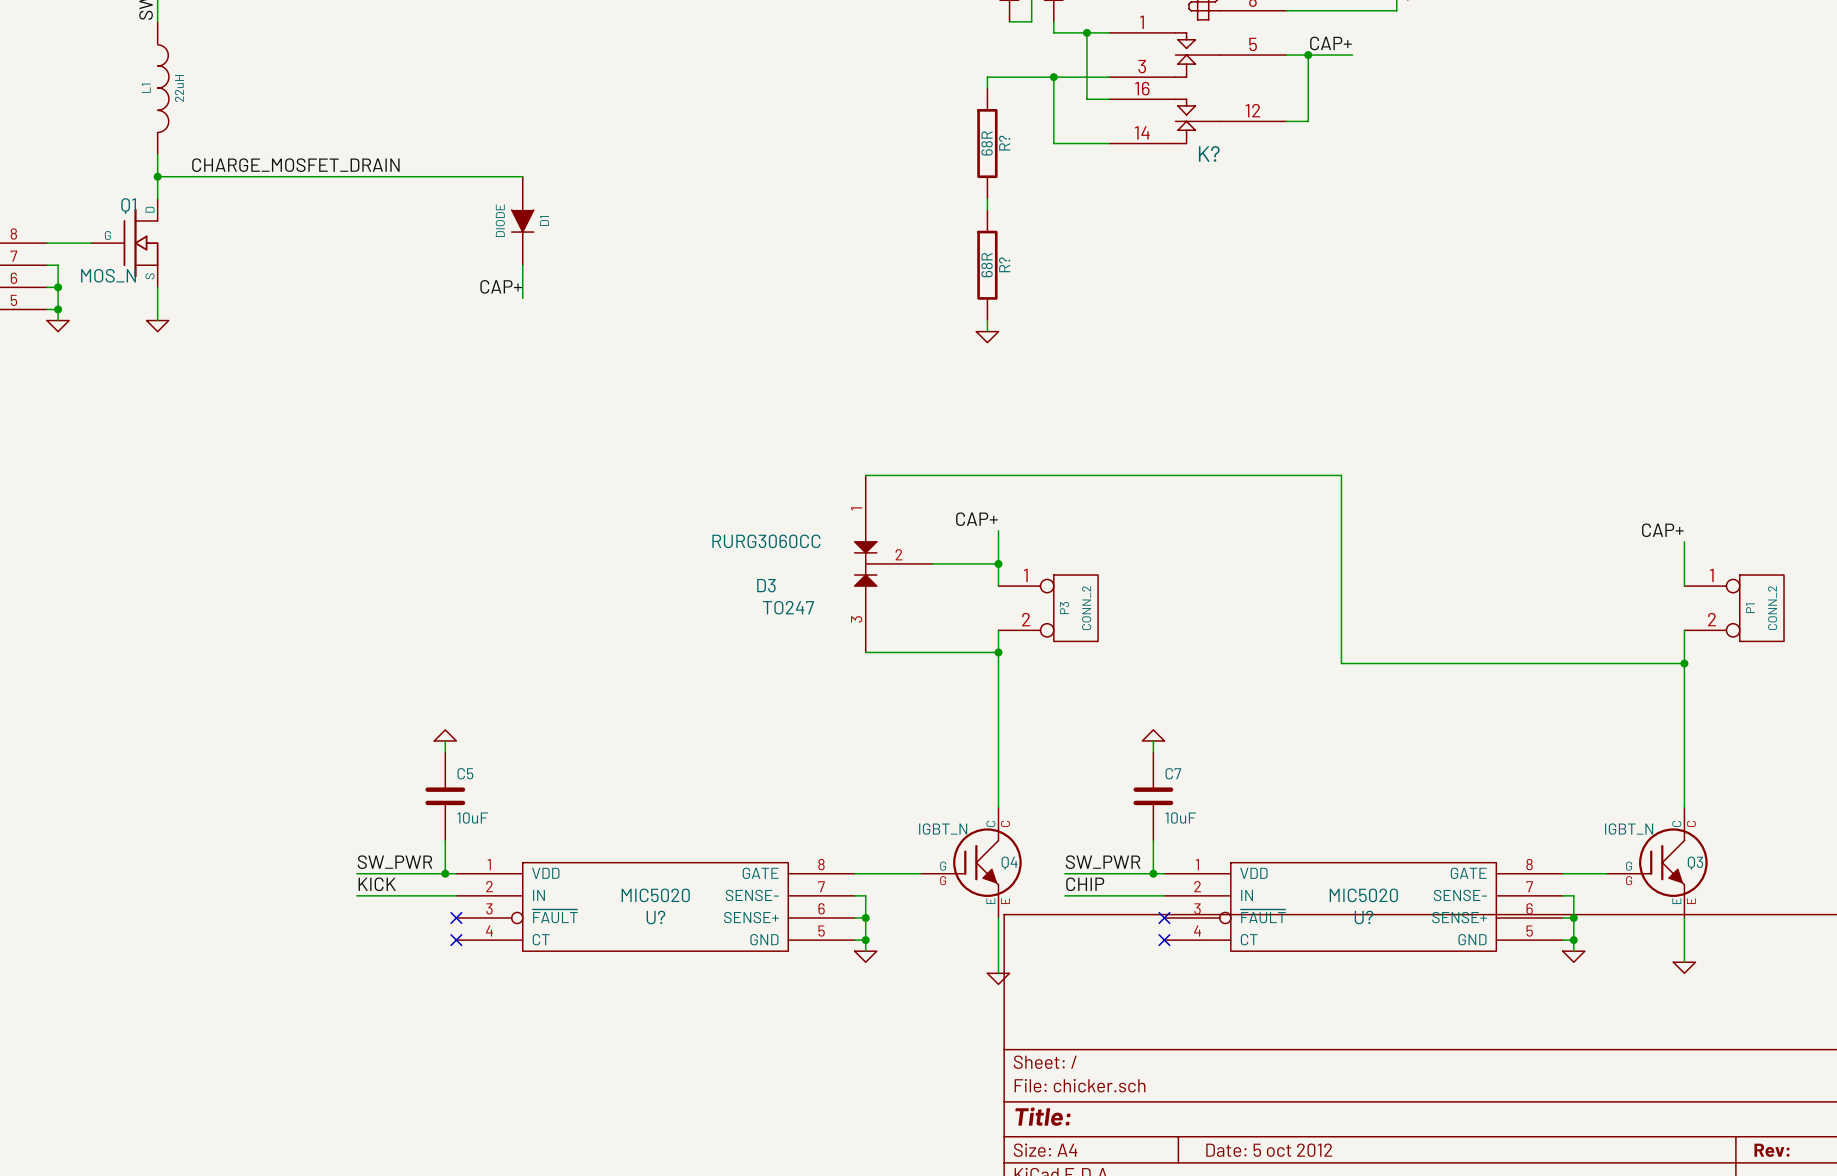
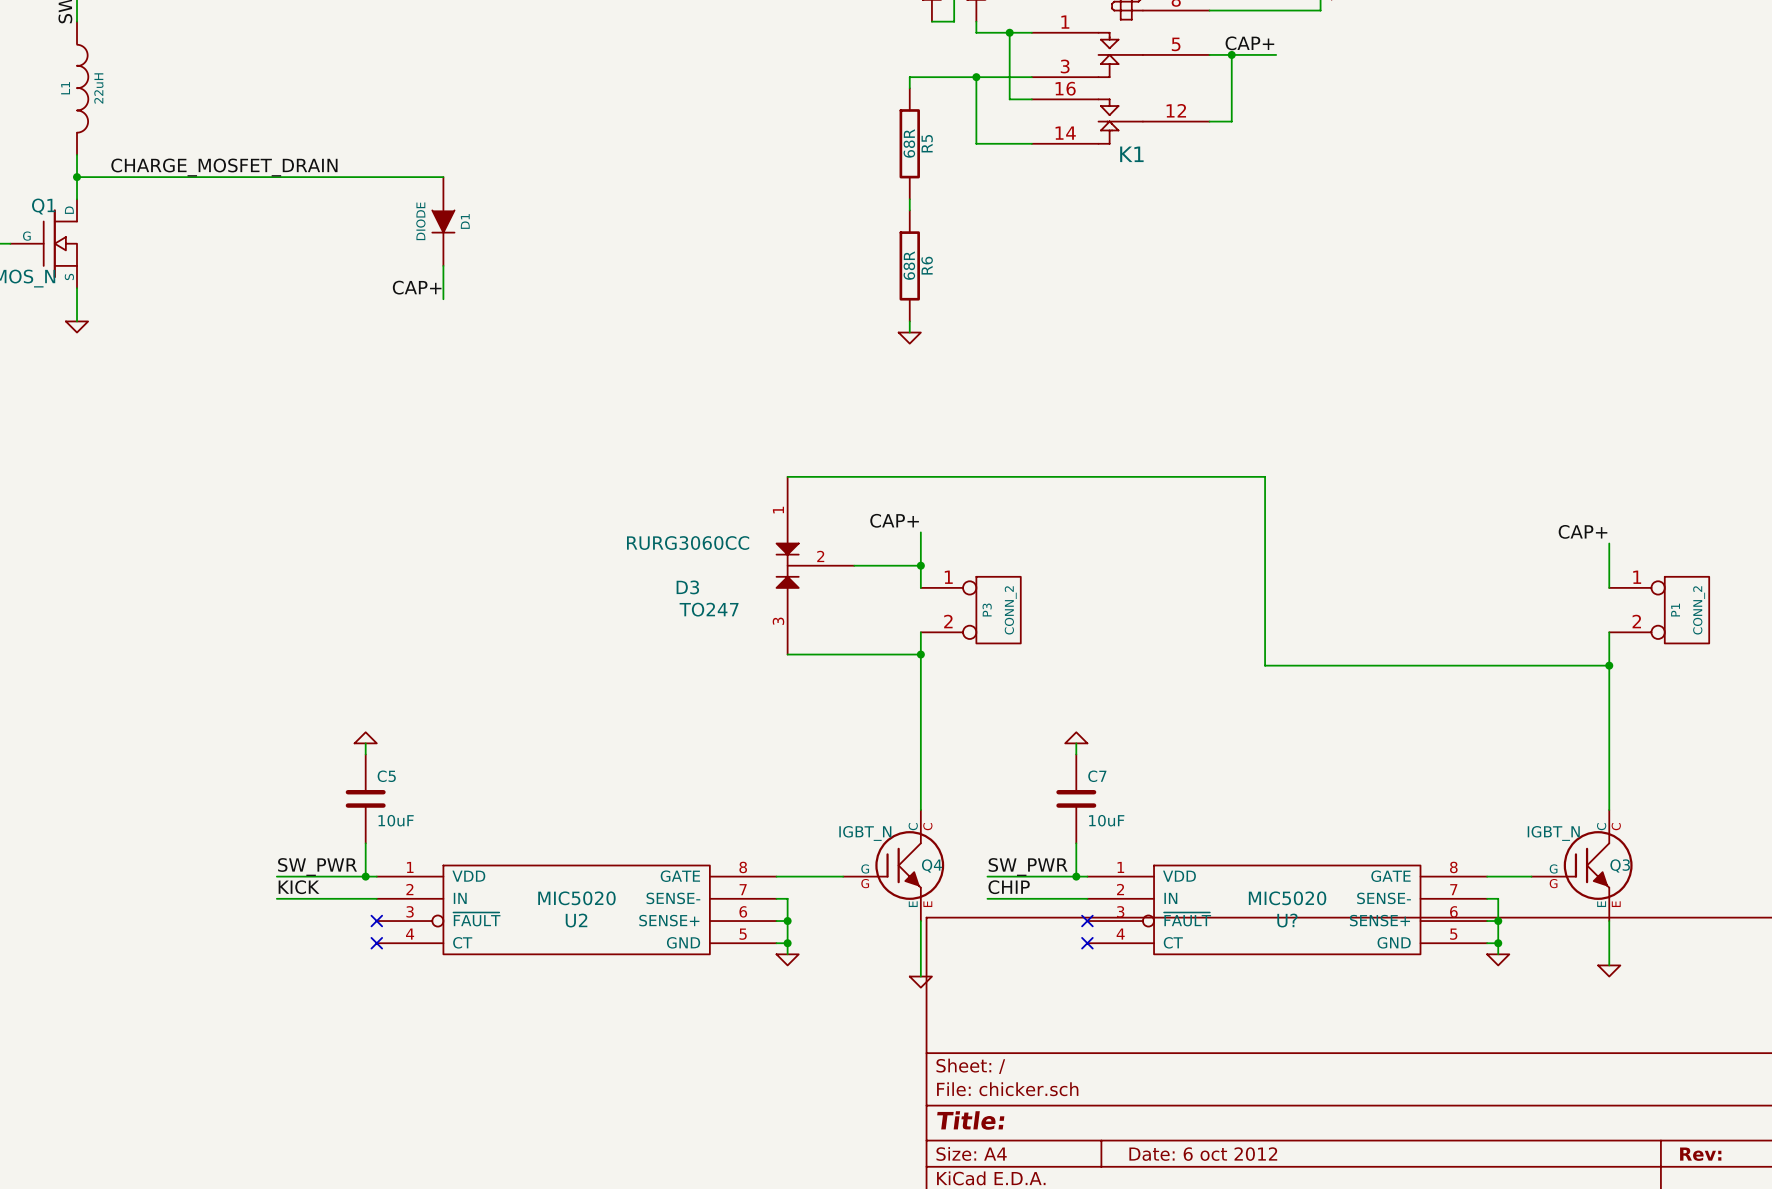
R? name: R? (1004, 143) -> R5 (927, 143)
K? name: K? (1209, 153) -> K1 (1131, 154)
R? name: R? (1004, 264) -> R6 (927, 265)
U? name: U? (655, 917) -> U2 (576, 920)
title block: Date: 5 oct 2012 (1269, 1150) -> Date: 6 oct 2012 (1203, 1154)

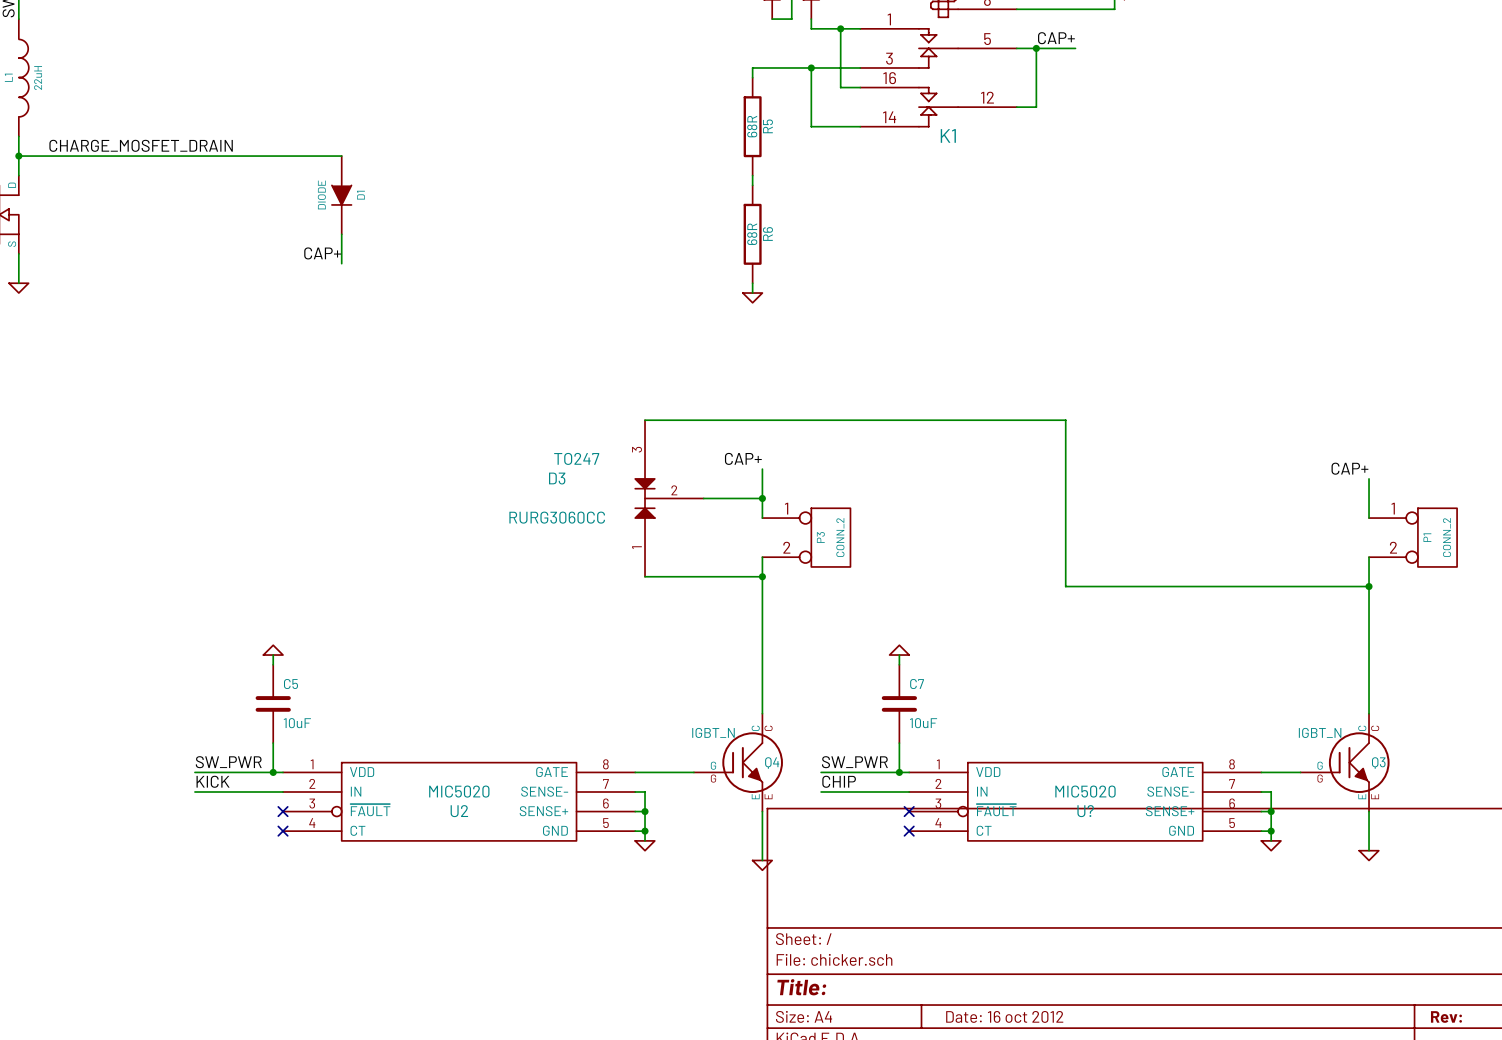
D3 flip: as is (787, 565) -> up-down (645, 498)
title block: Date: 6 oct 2012 (1203, 1154) -> Date: 16 oct 2012 (1004, 1016)

